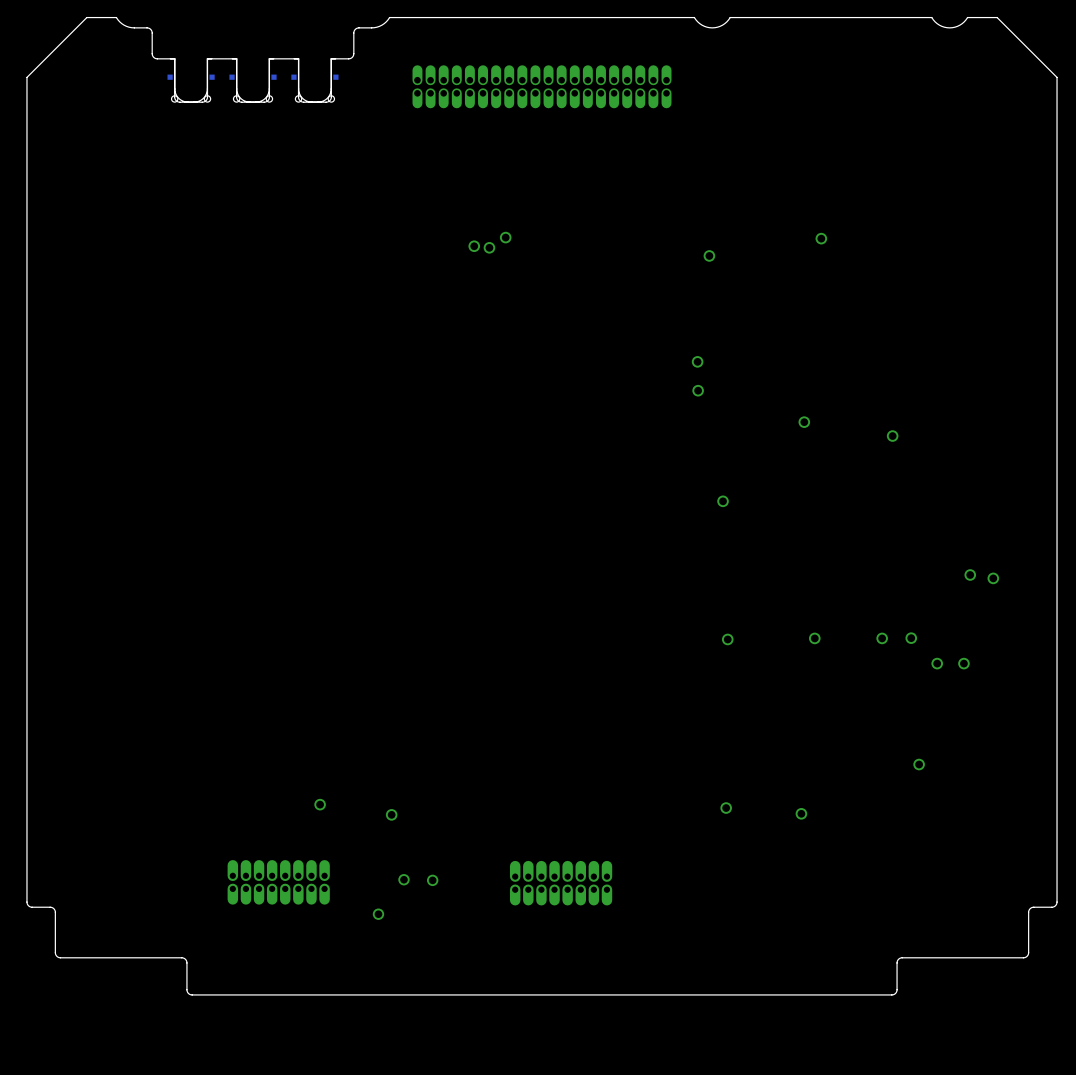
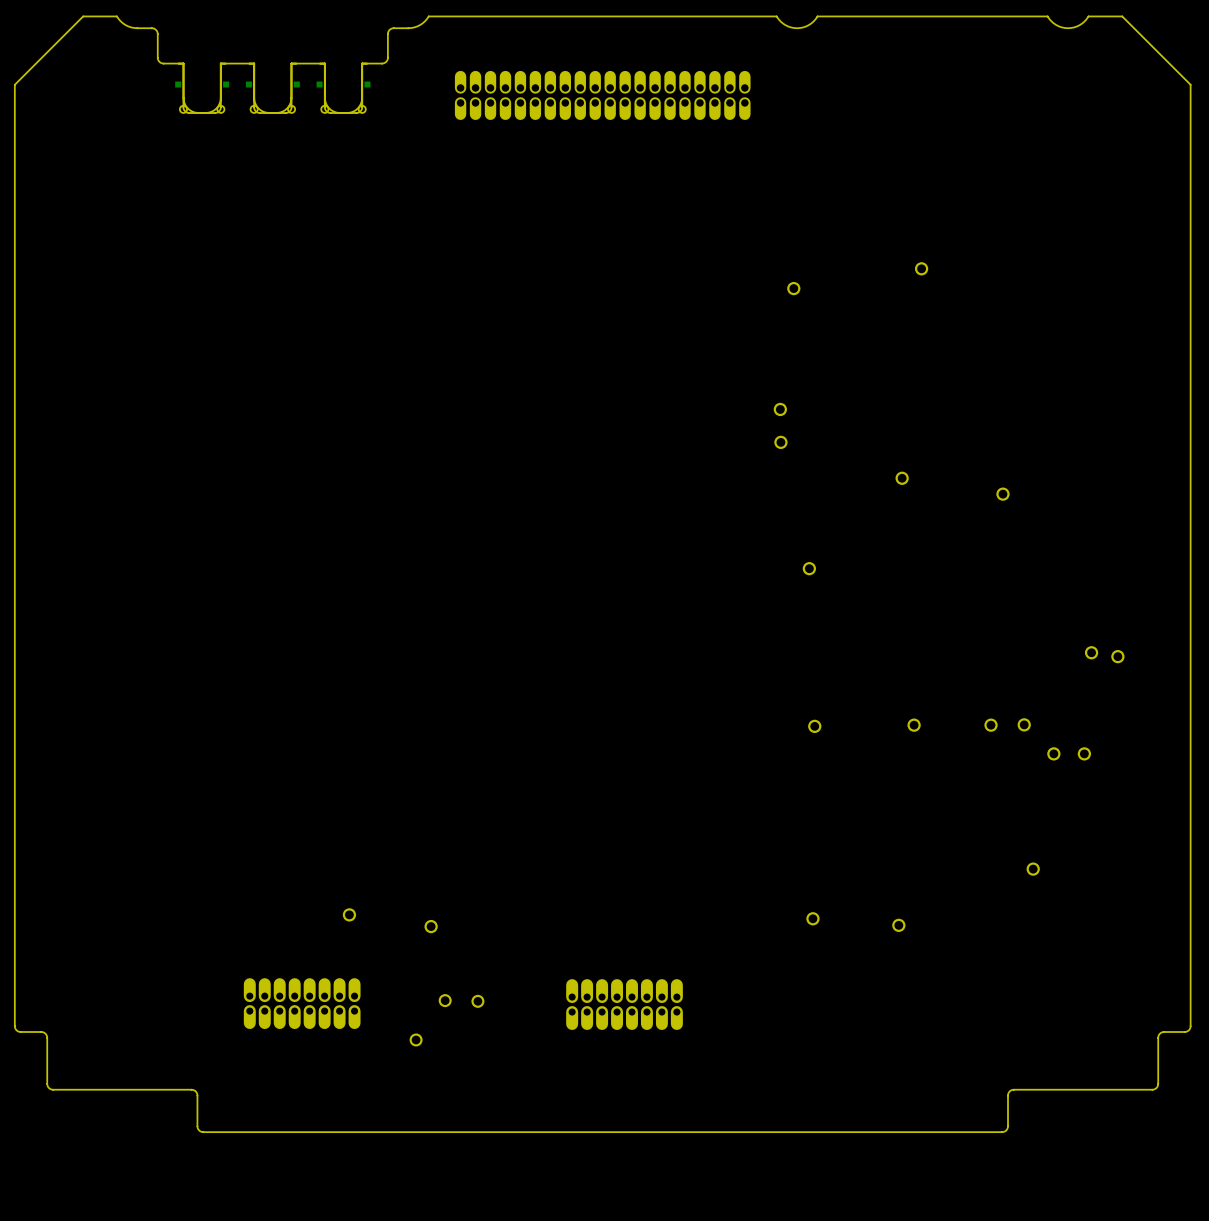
part: (505, 237) -> none
part: (474, 246) -> none
part: (489, 247) -> none

